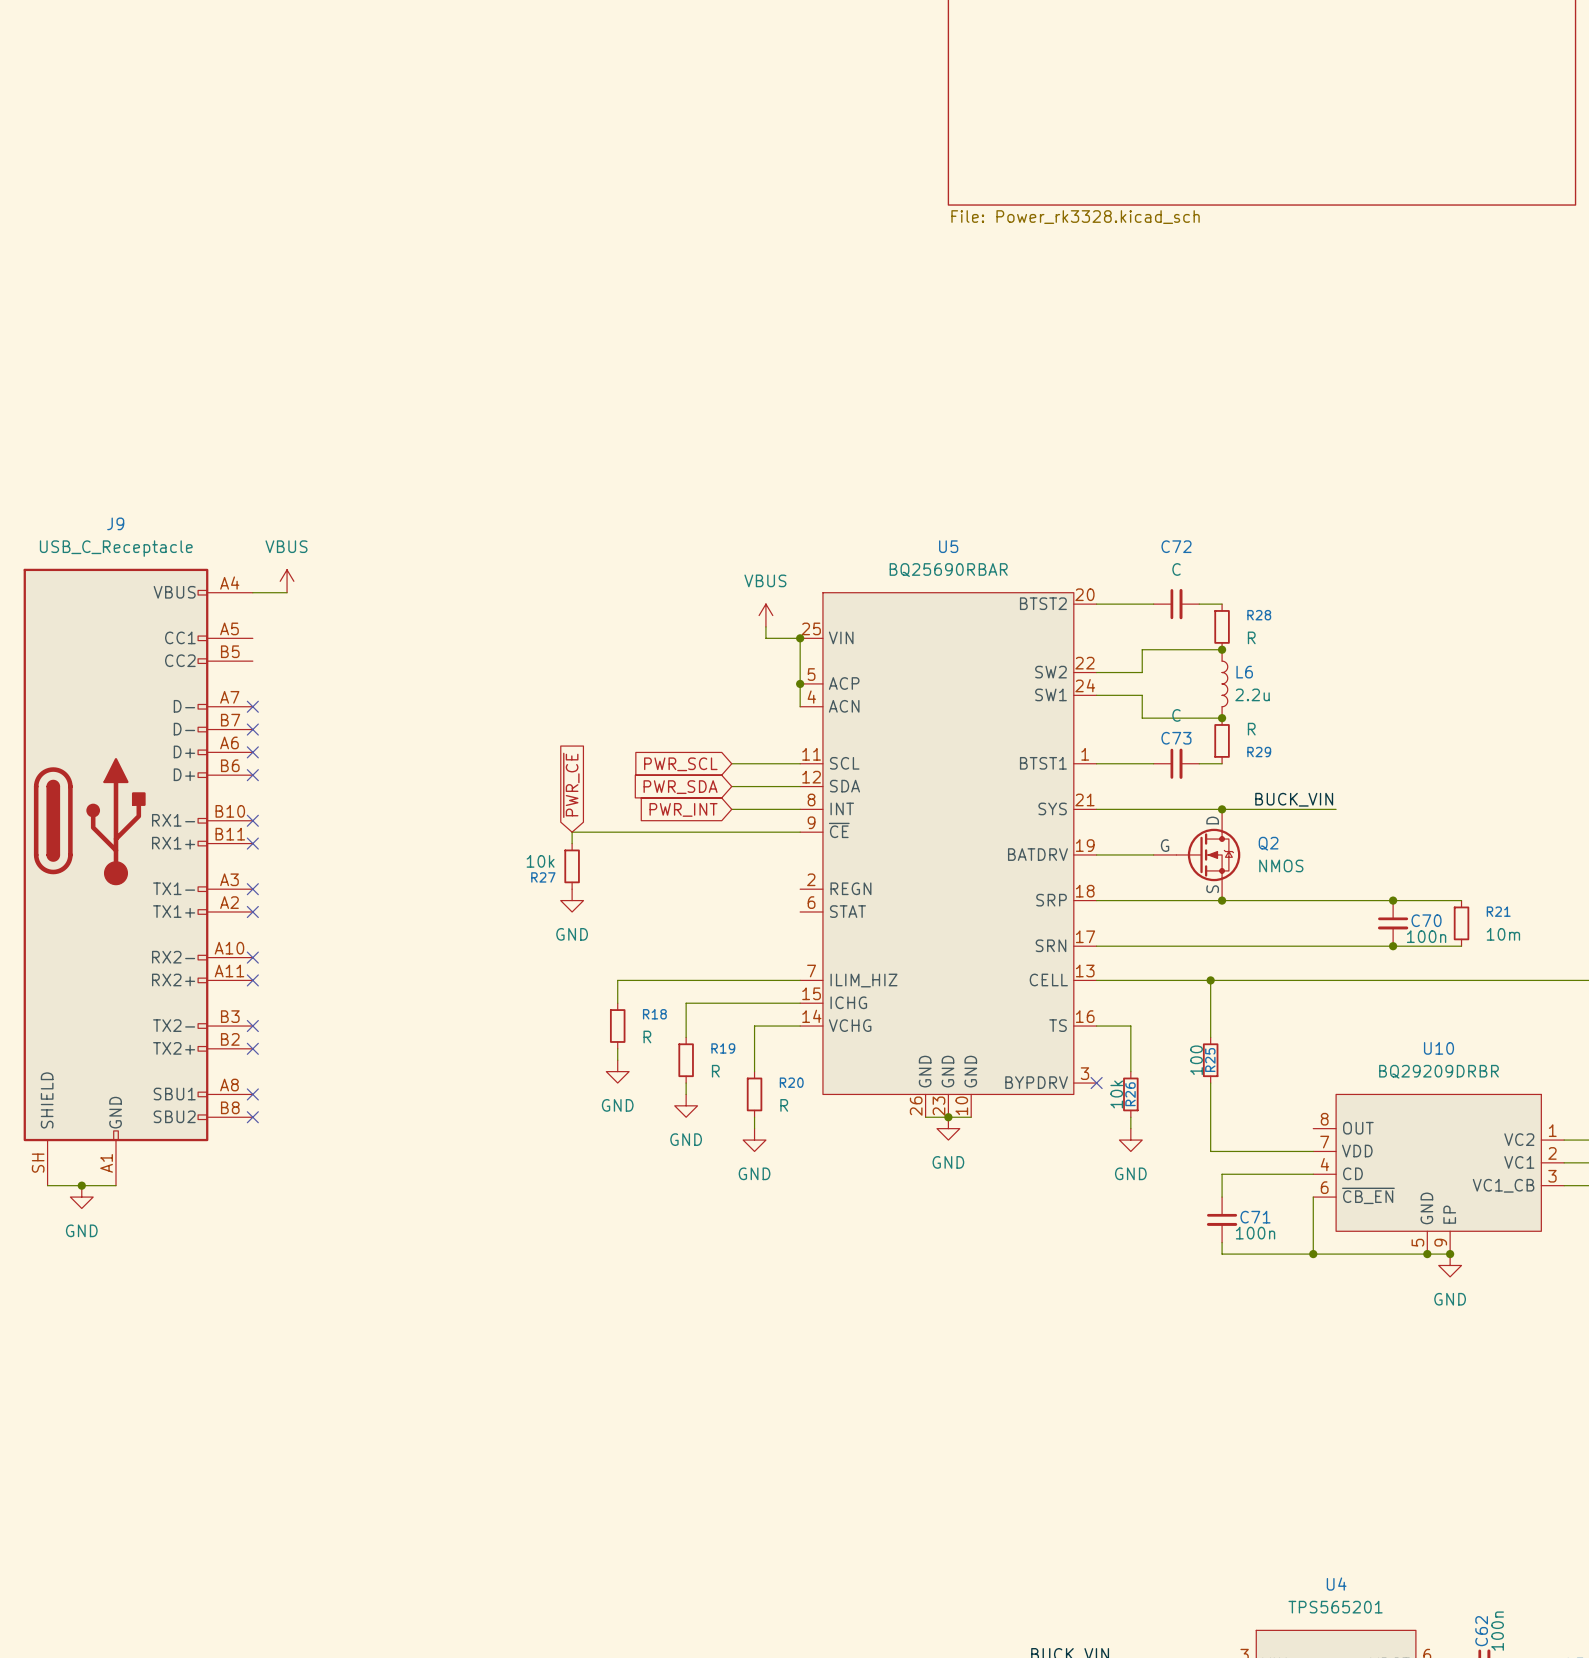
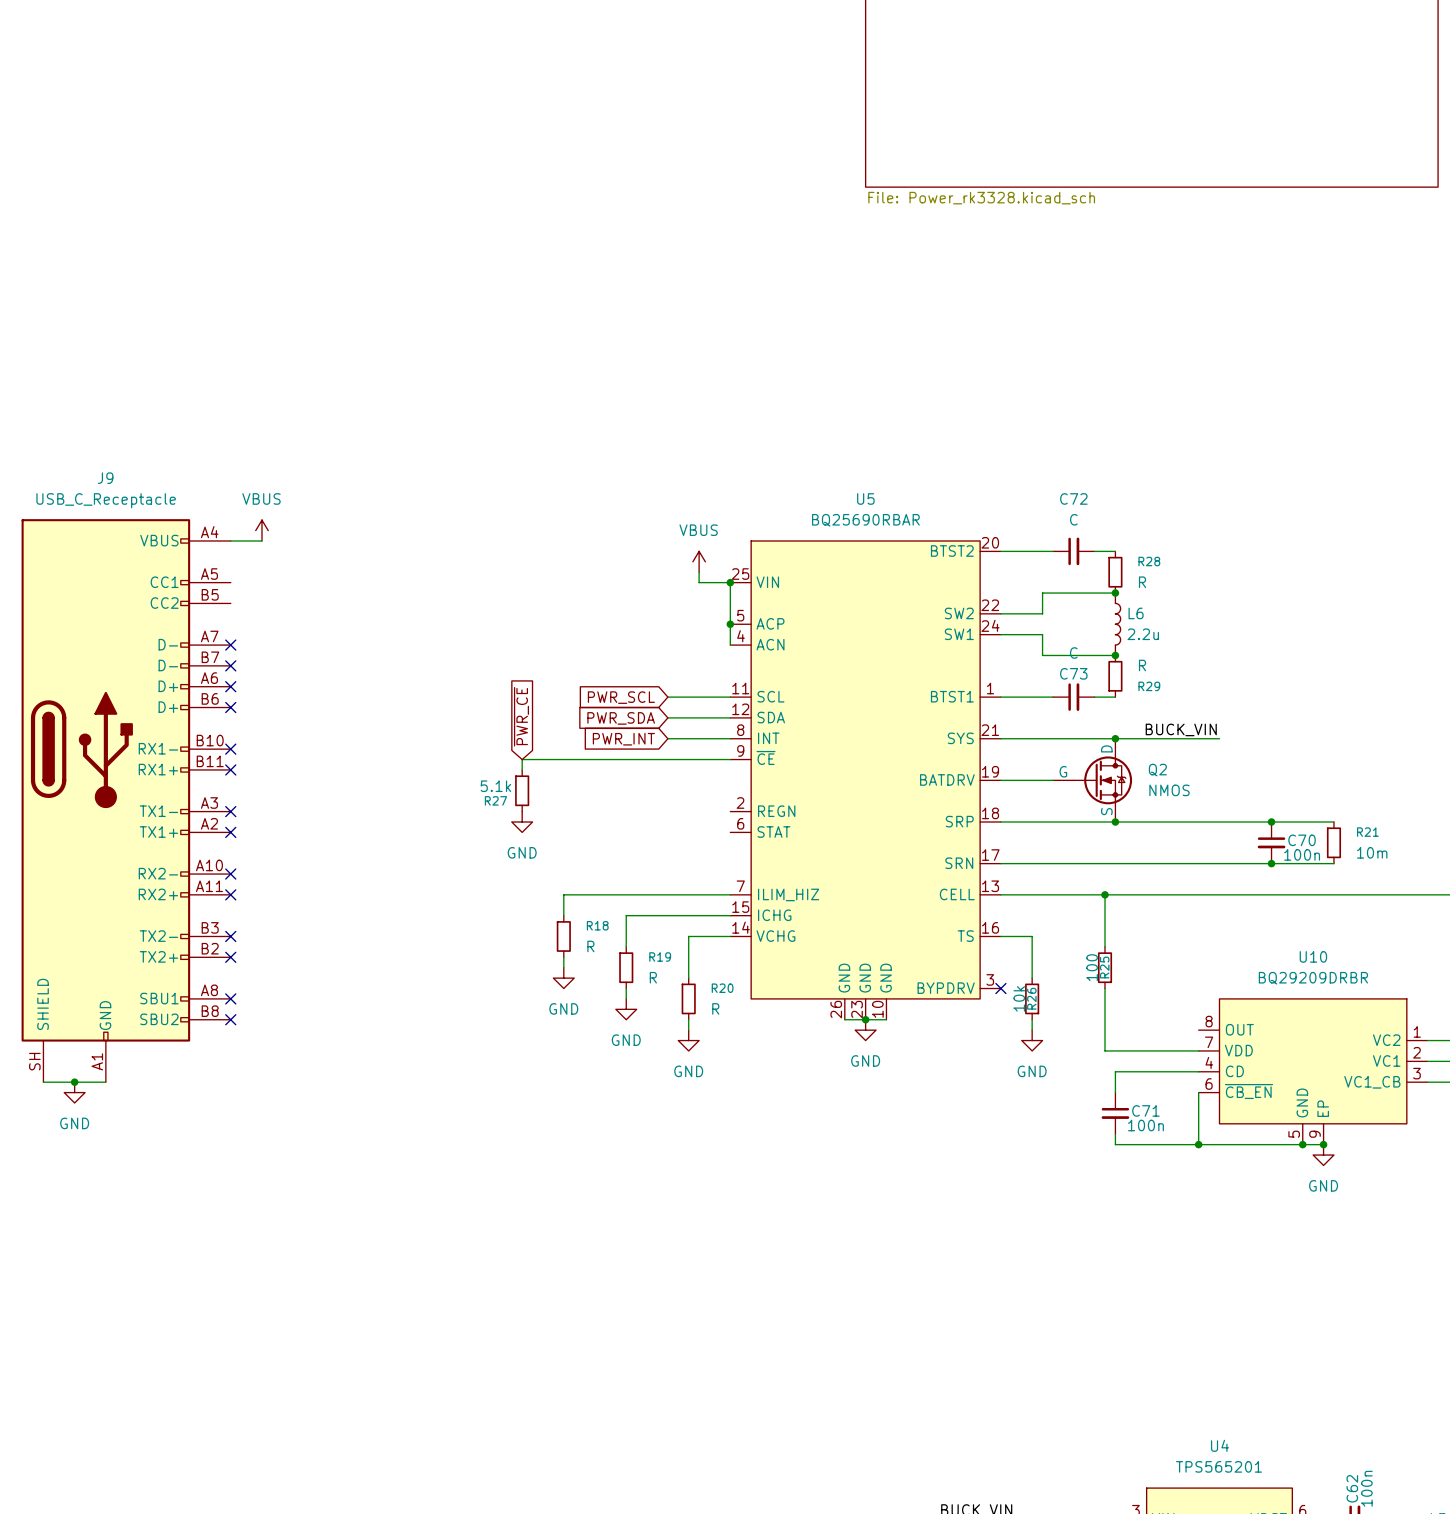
R27 value: 10k (540, 861) -> 5.1k (495, 786)

